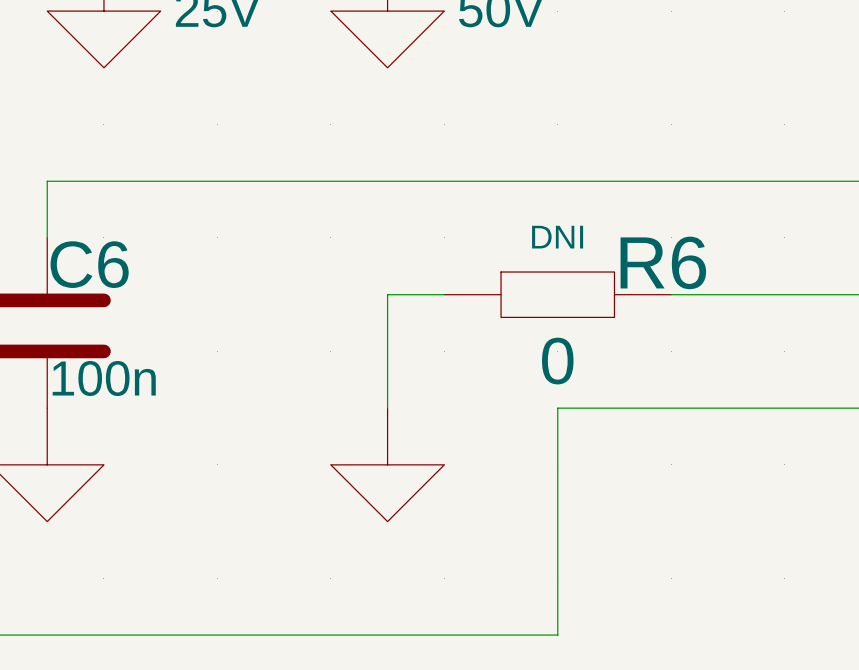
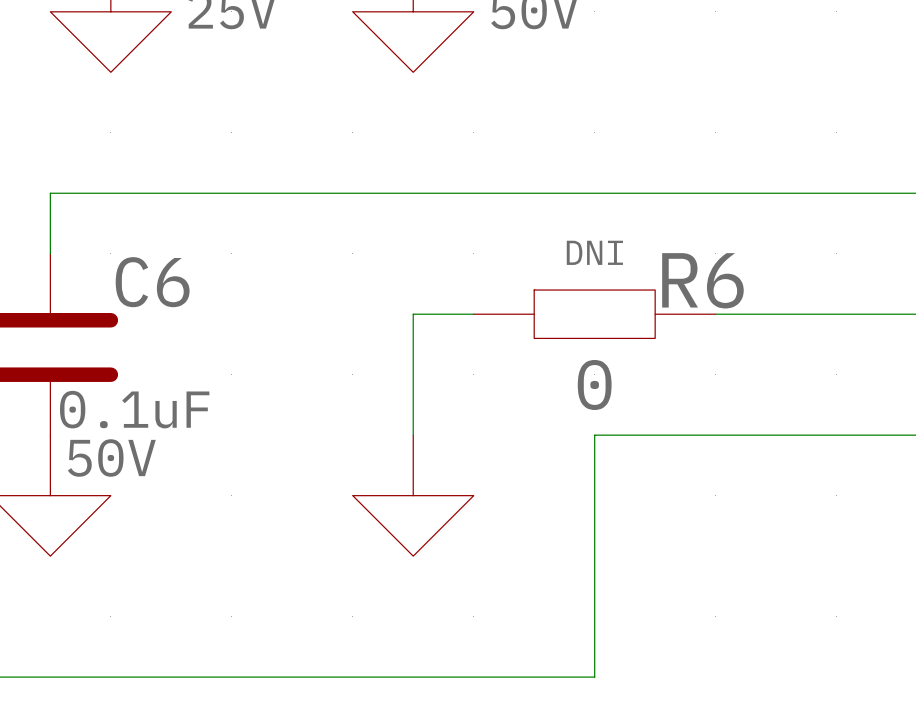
C6 name position: C6 (89, 264) -> C6 (152, 282)
C6 text: 100n (104, 378) -> 0.1uF (134, 409)
C6 text: none -> 50V (111, 458)

